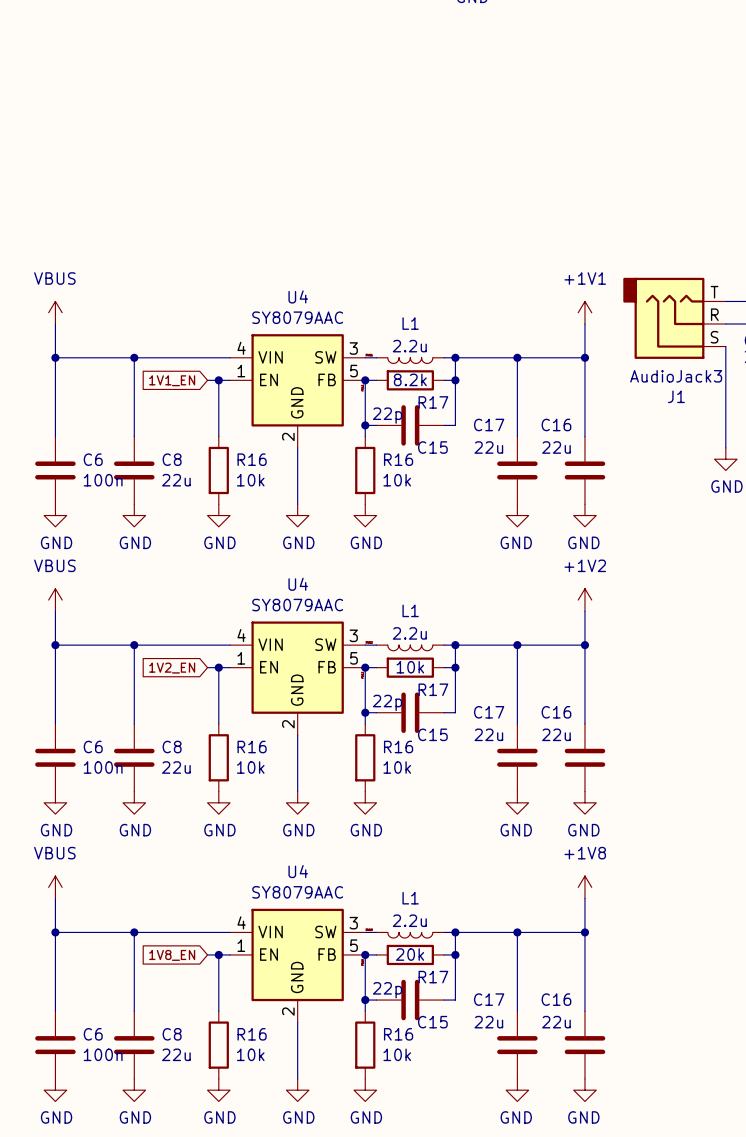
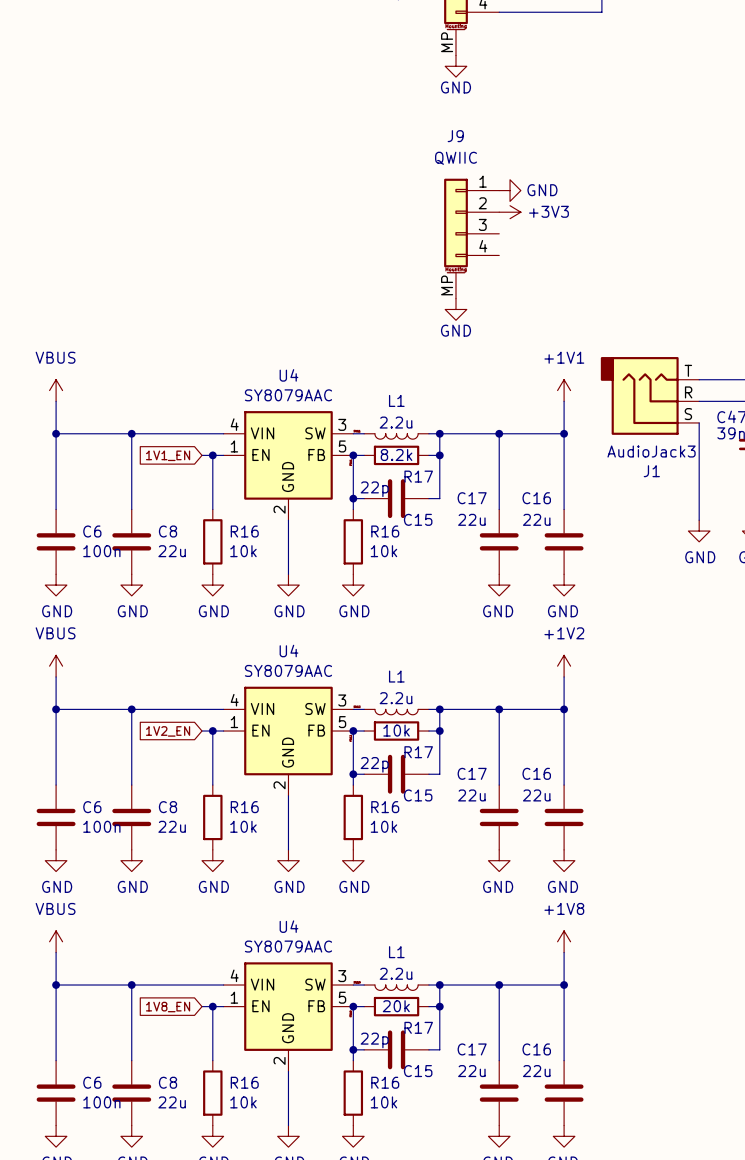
power symbol: none -> GND (510, 190)
power symbol: none -> +3V3 (510, 212)
J9: none -> QWIIC (471, 238)
power symbol: none -> GND (455, 309)

